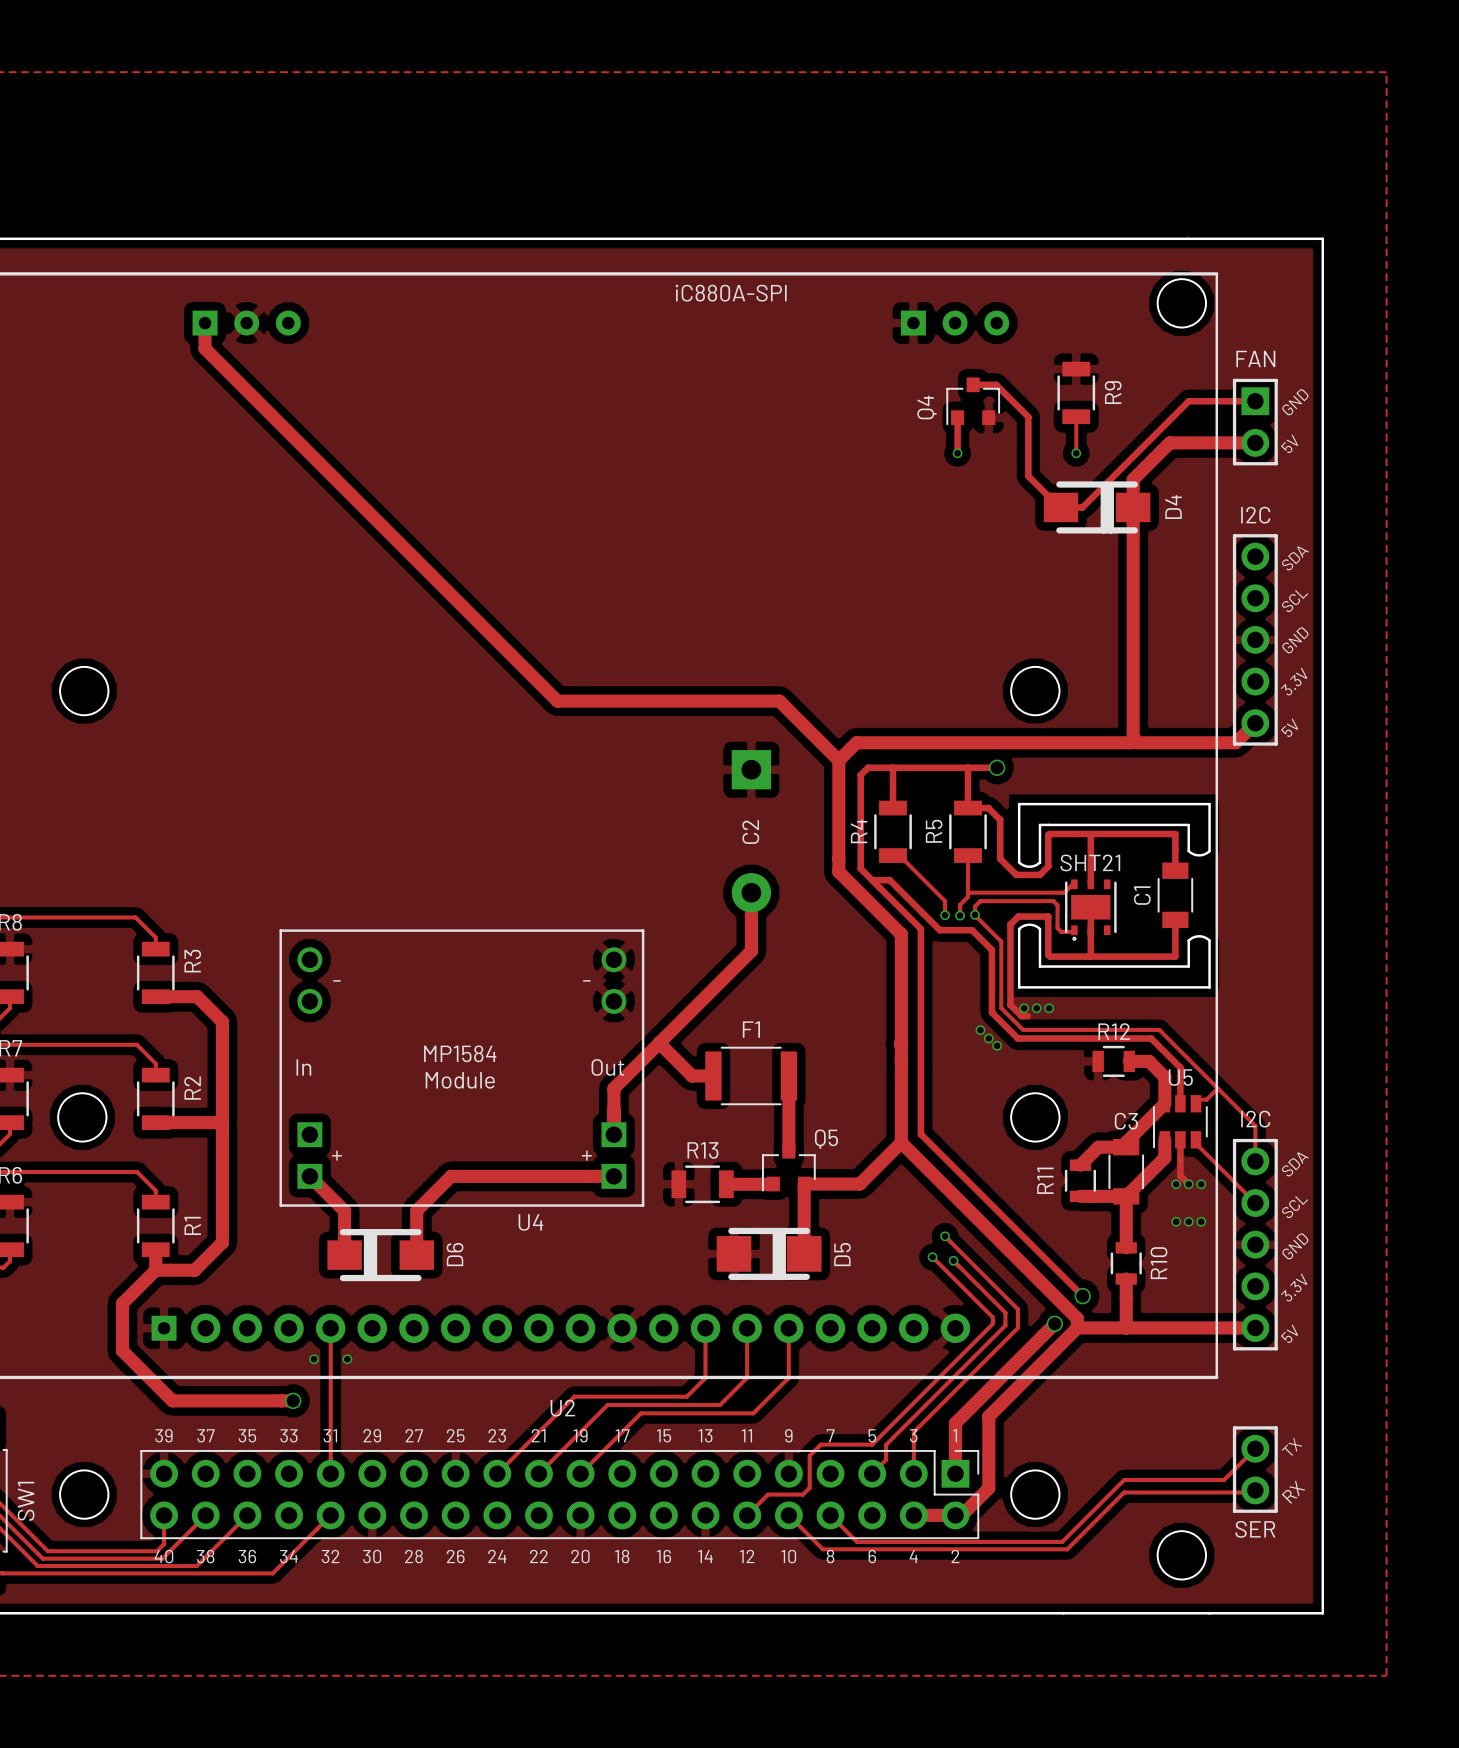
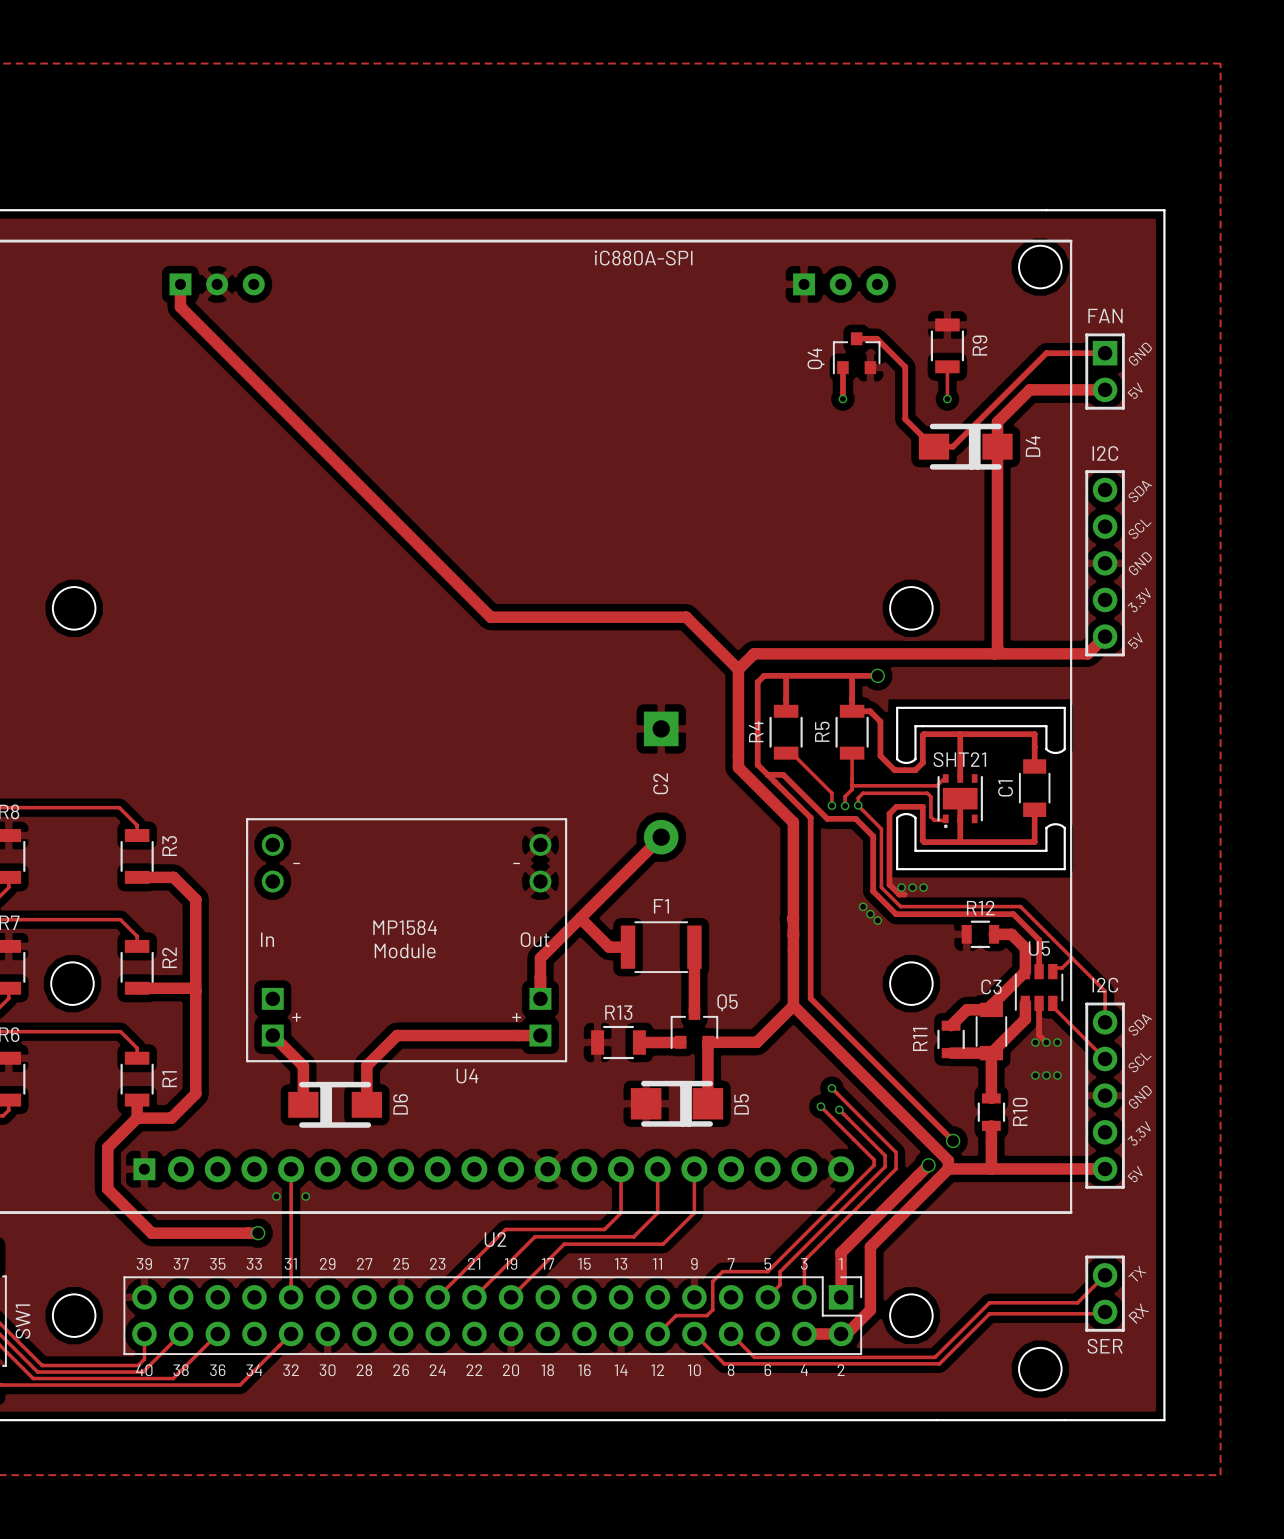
C2 position: (751, 831) -> (661, 783)
track: (751, 892) (751, 950) -> none

